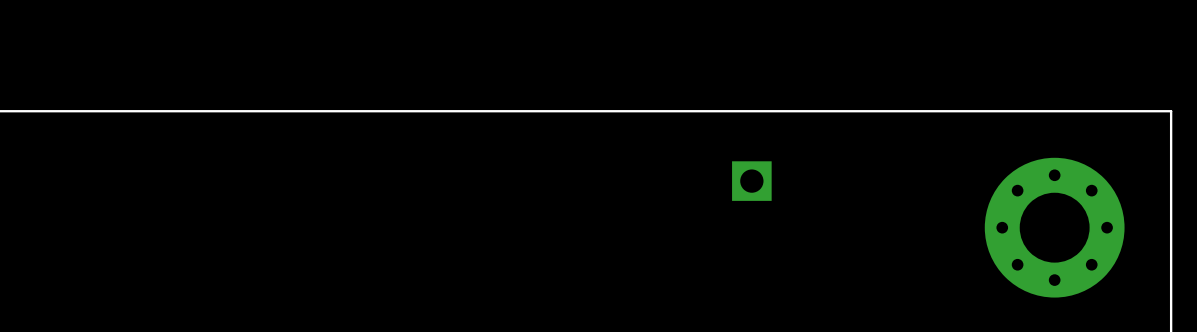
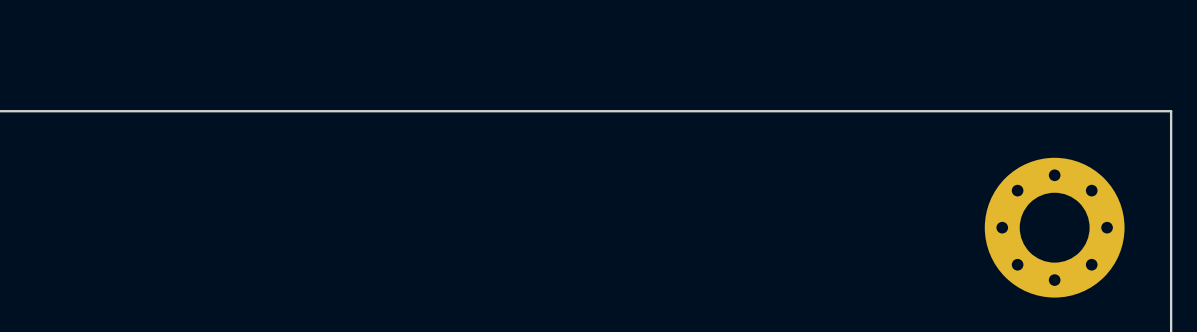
part: (751, 181) -> none

